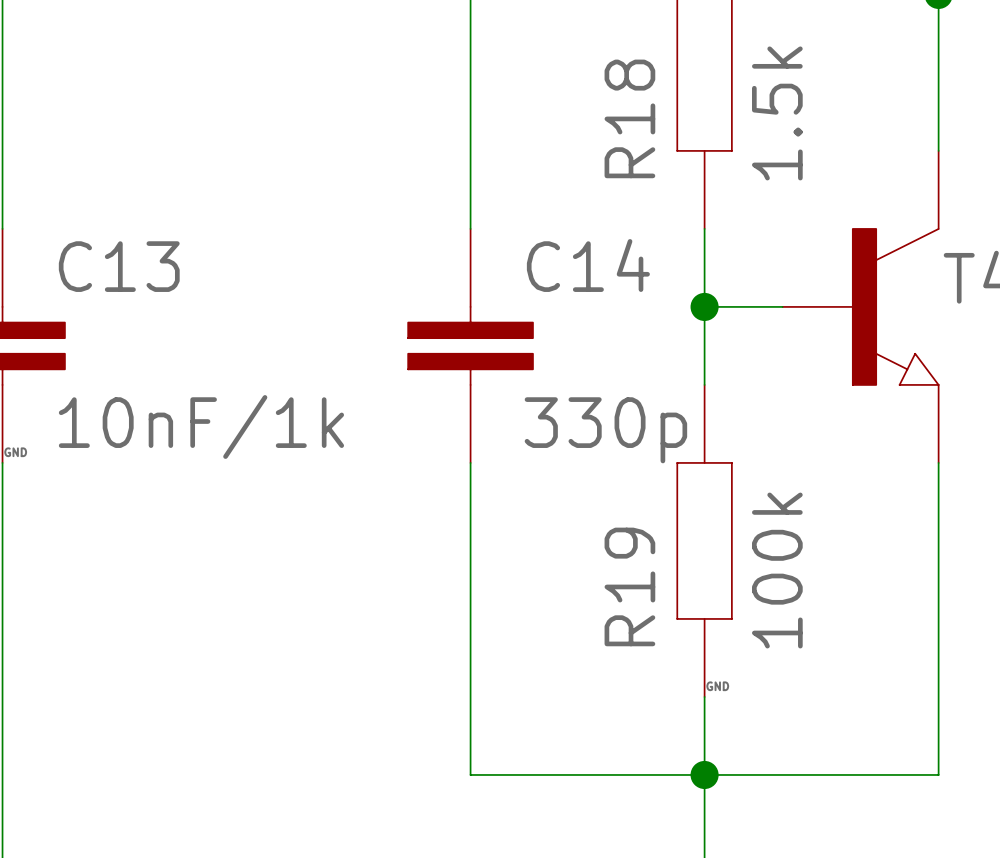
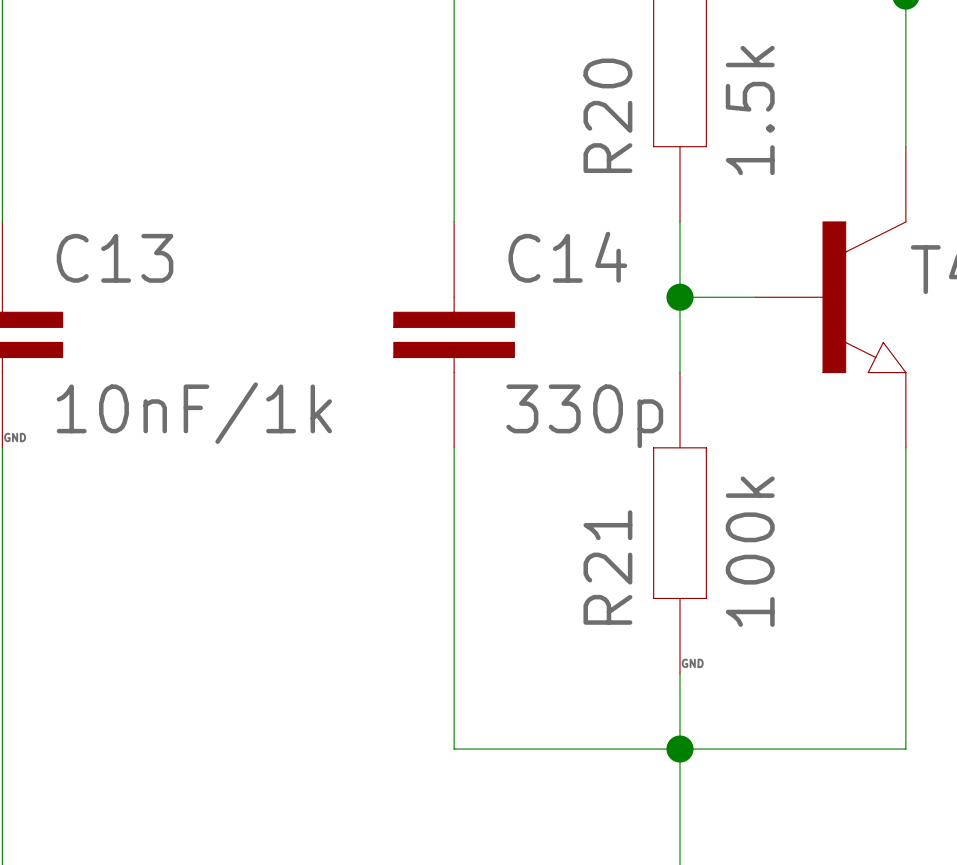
R18 name: R18 (629, 118) -> R20 (607, 115)
R19 name: R19 (629, 586) -> R21 (607, 567)

